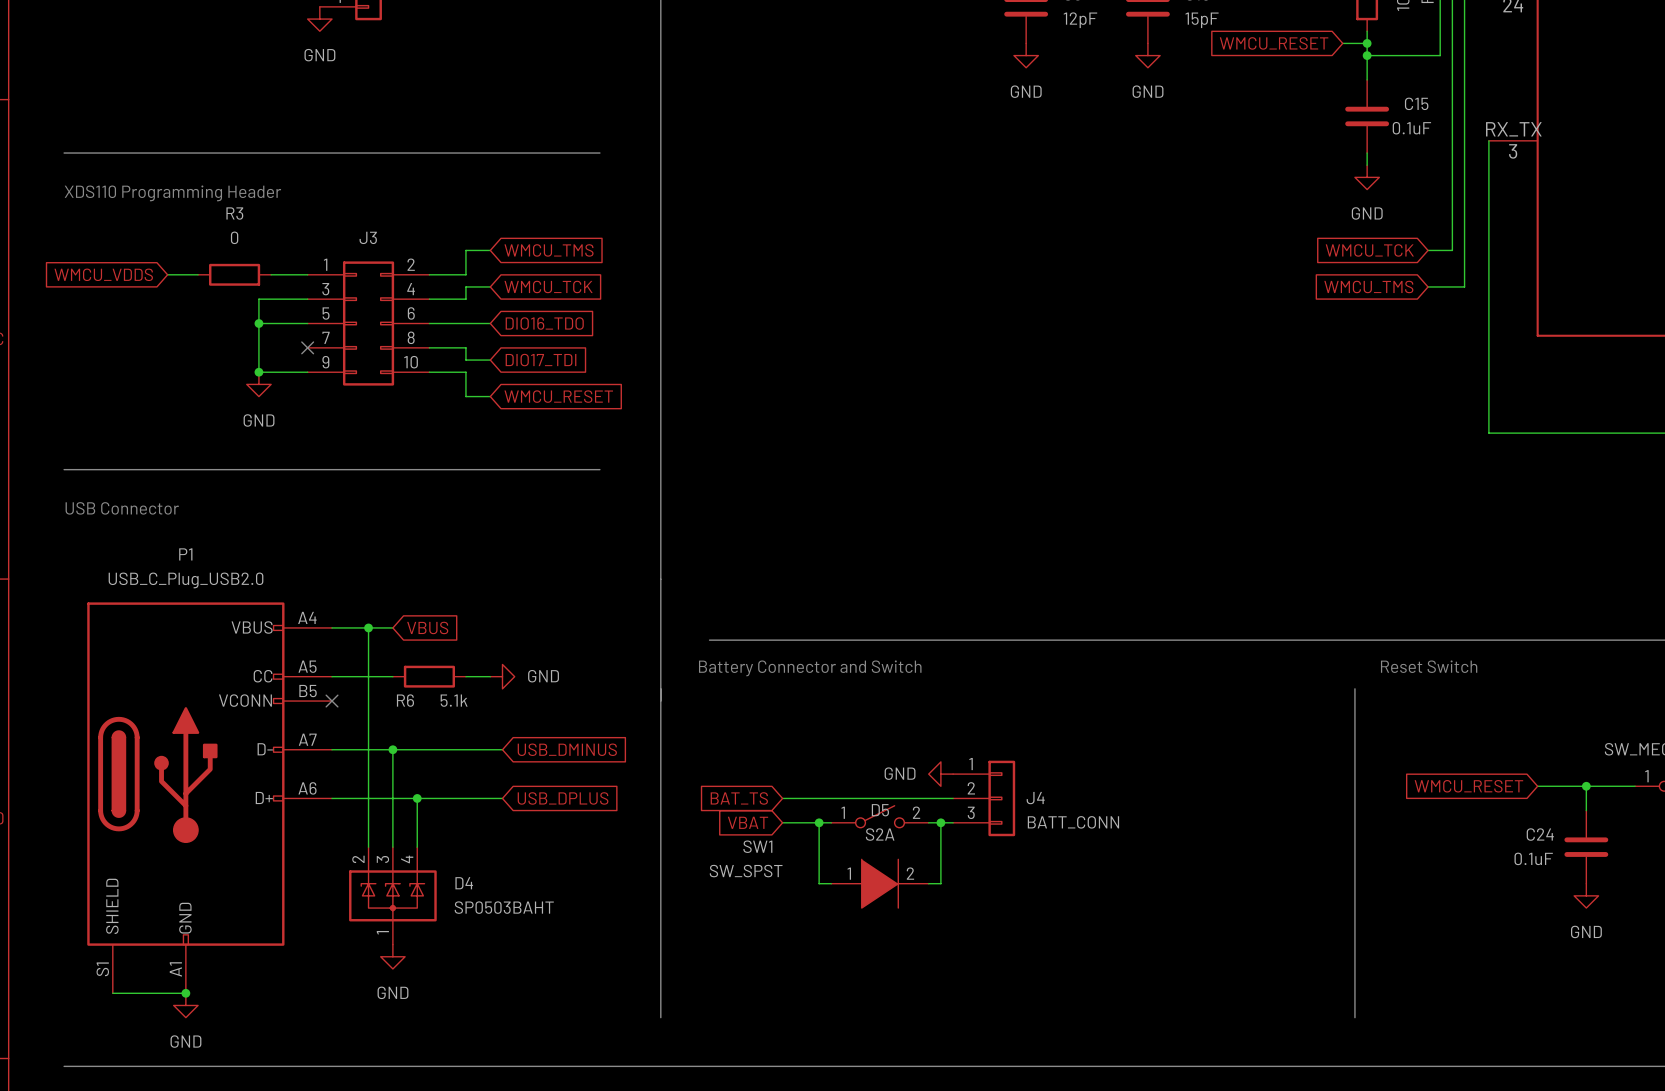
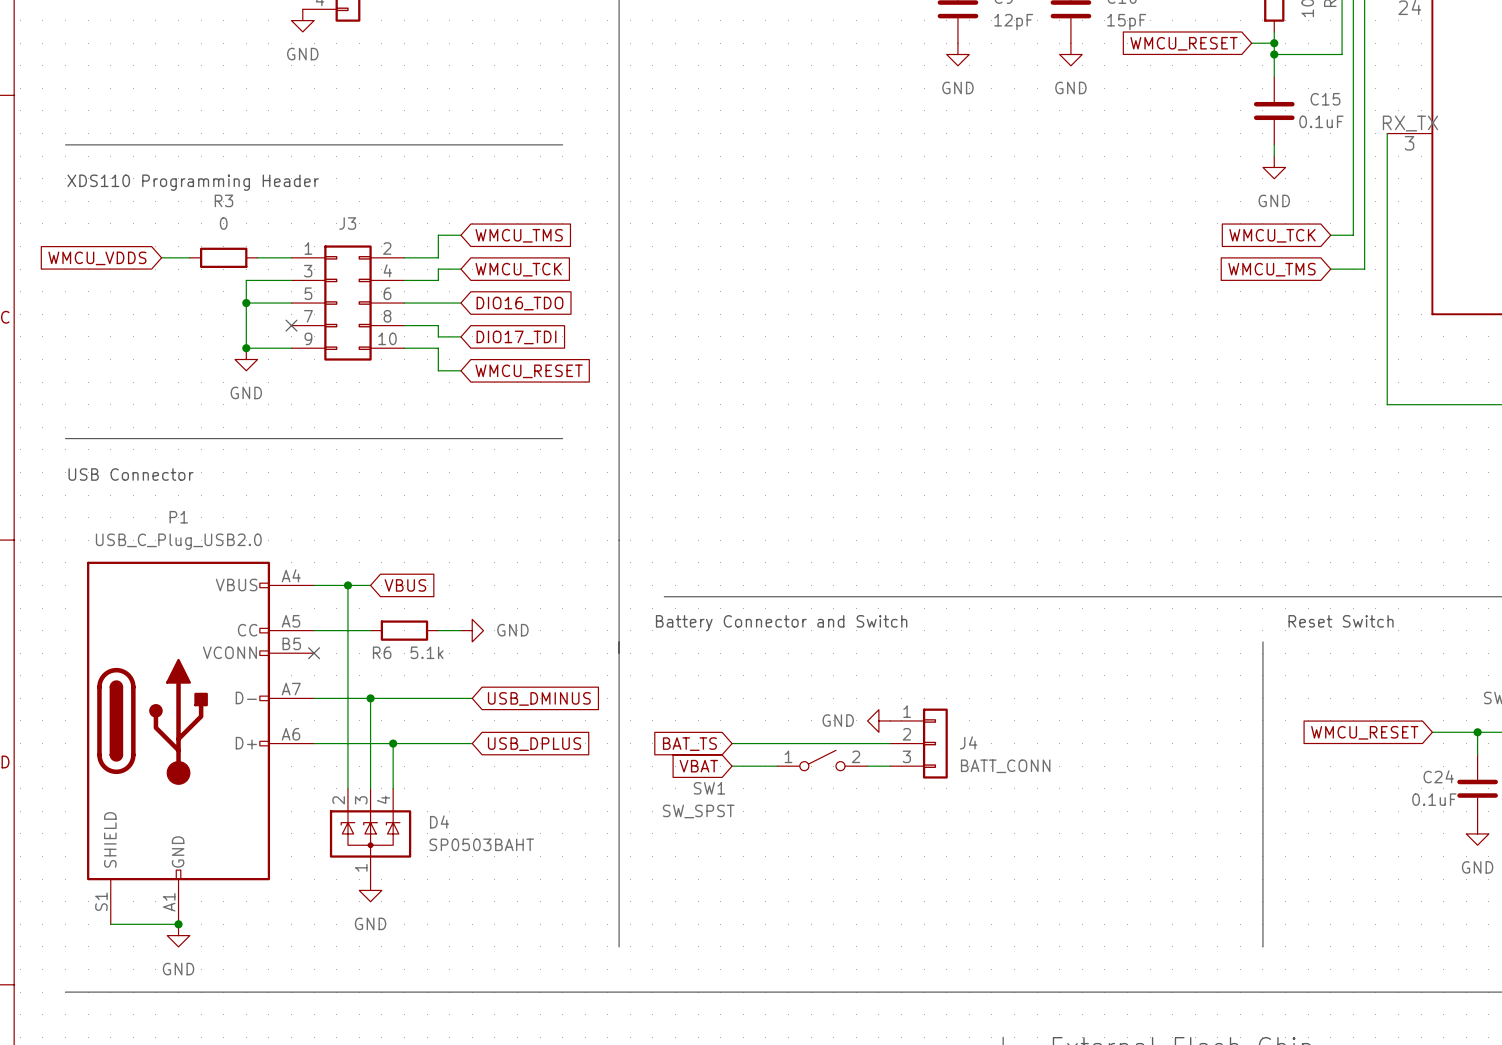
wire: (819, 822) (819, 883) (831, 883) -> none
junction: (819, 822) -> none
wire: (940, 822) (940, 883) (928, 883) -> none
junction: (940, 822) -> none
D5: S2A (880, 883) -> none

